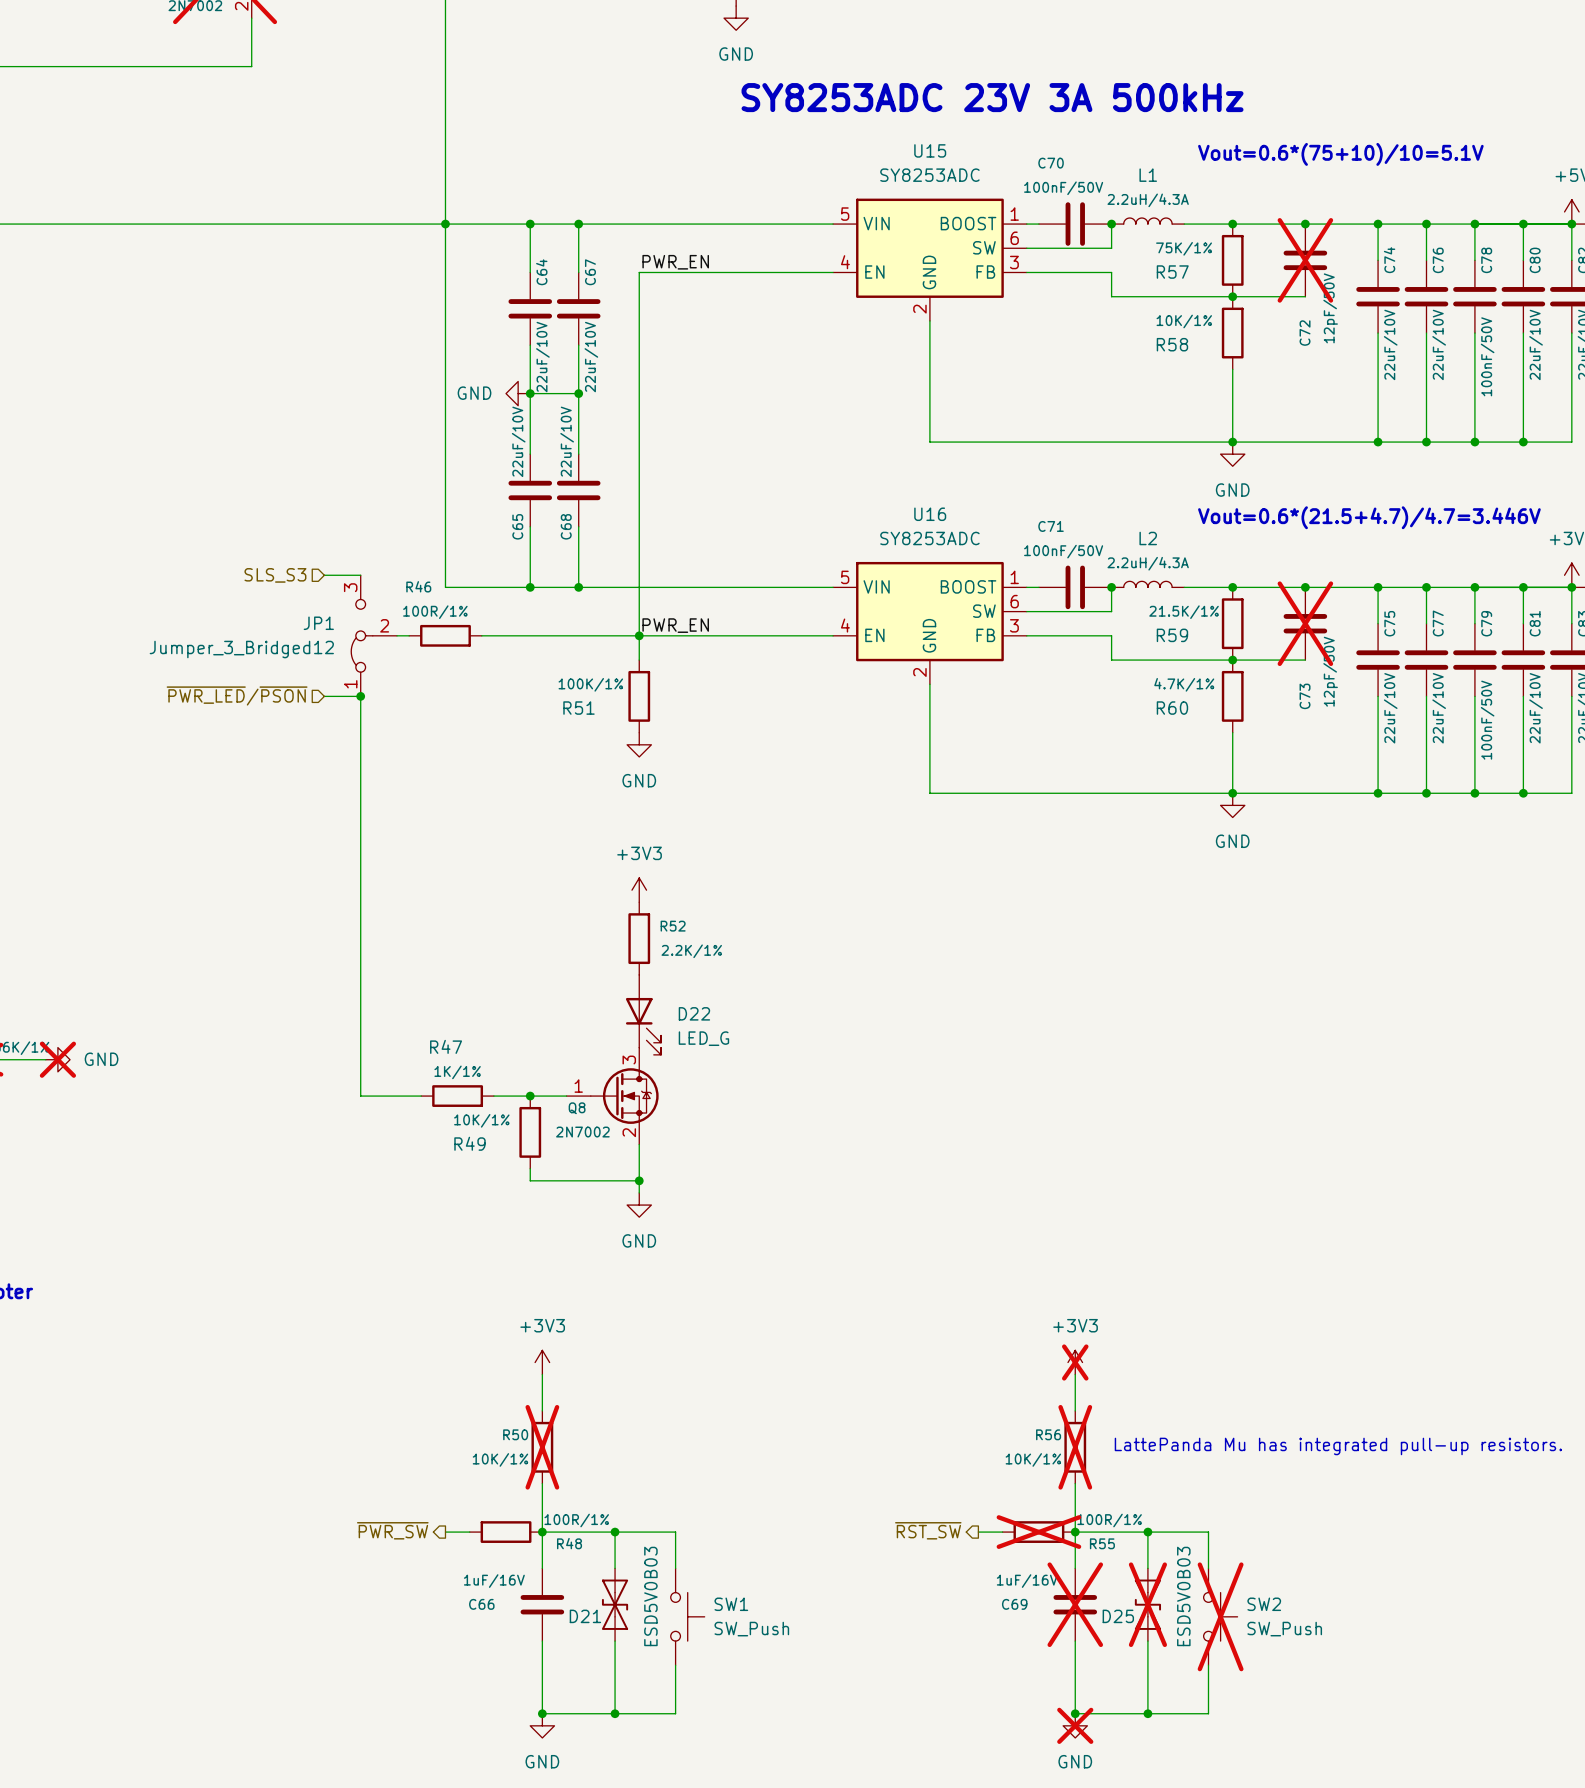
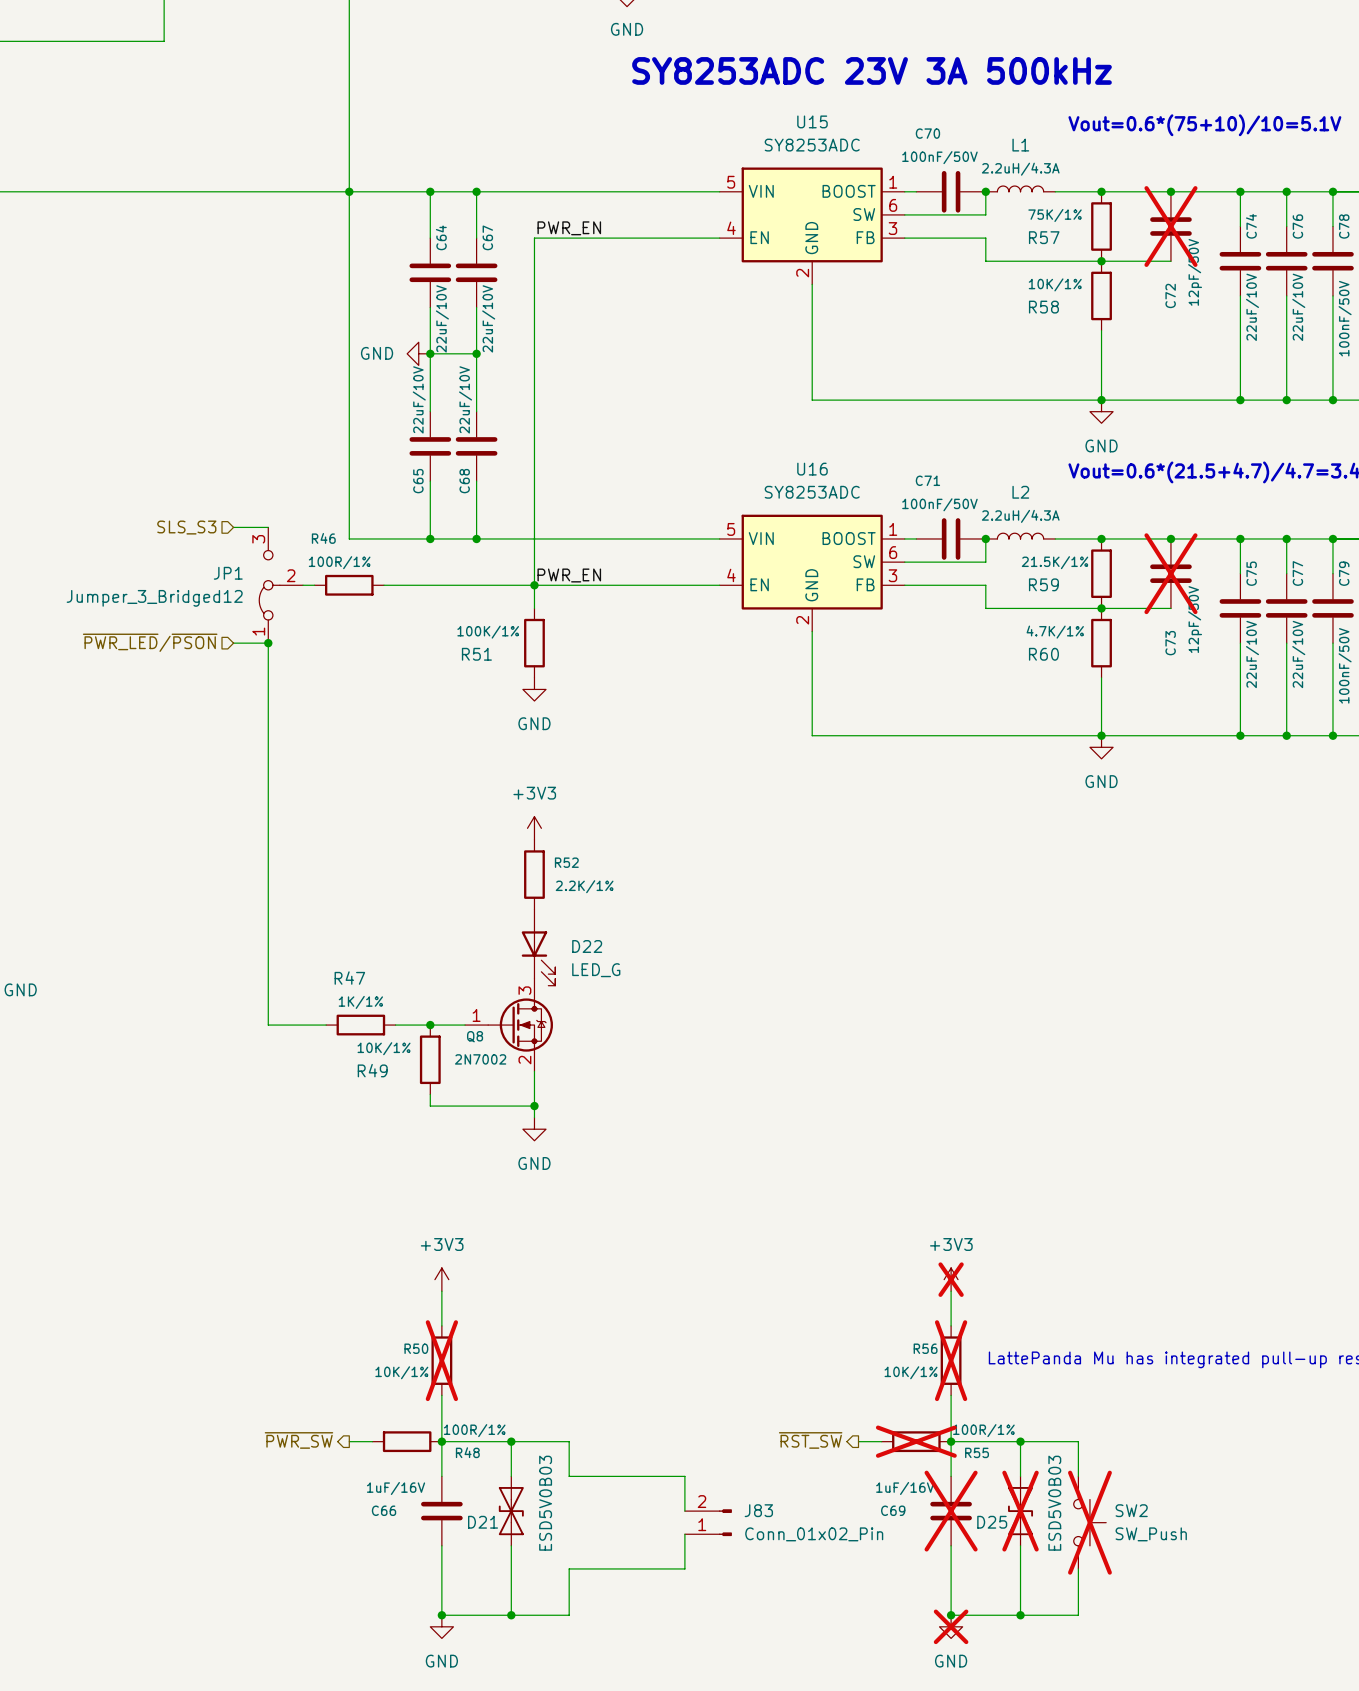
wire: none -> (569, 1476) (684, 1476) (684, 1511)
SW1: SW_Push (687, 1616) -> none
J83: none -> Conn_01x02_Pin (708, 1522)
wire: none -> (684, 1534) (684, 1568) (569, 1568)

